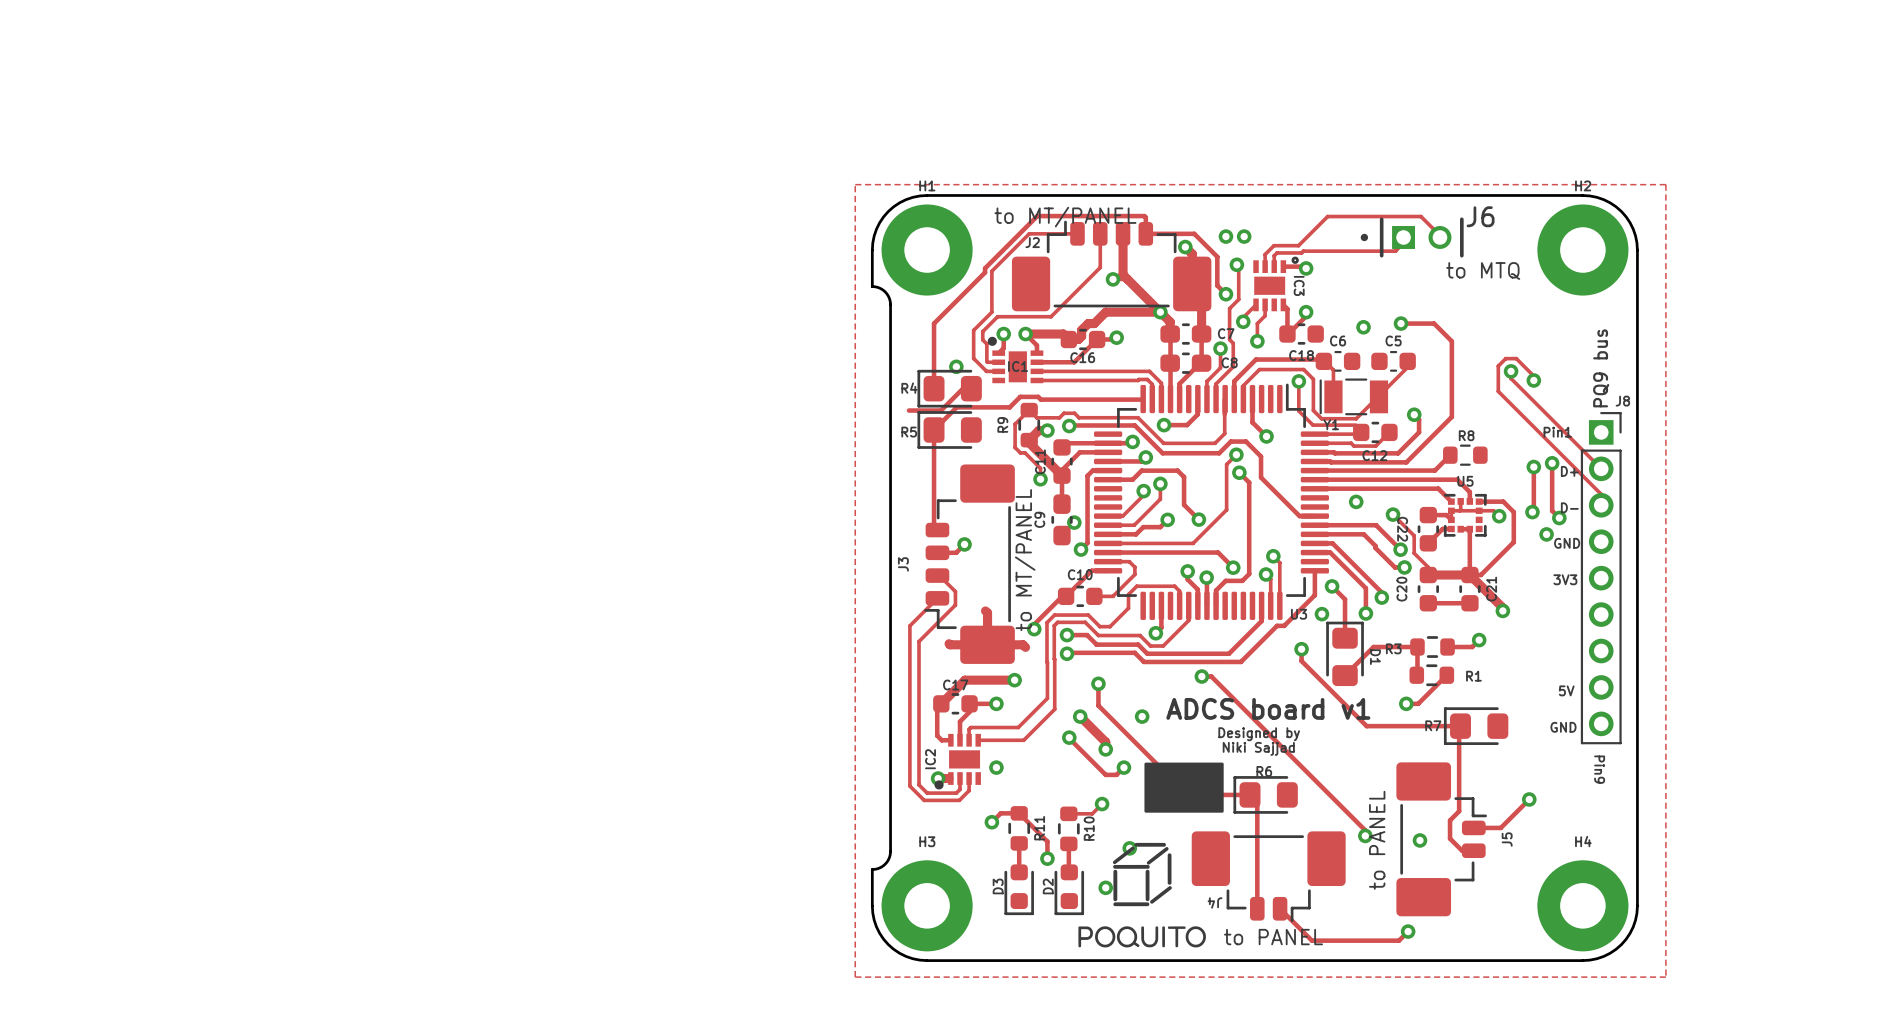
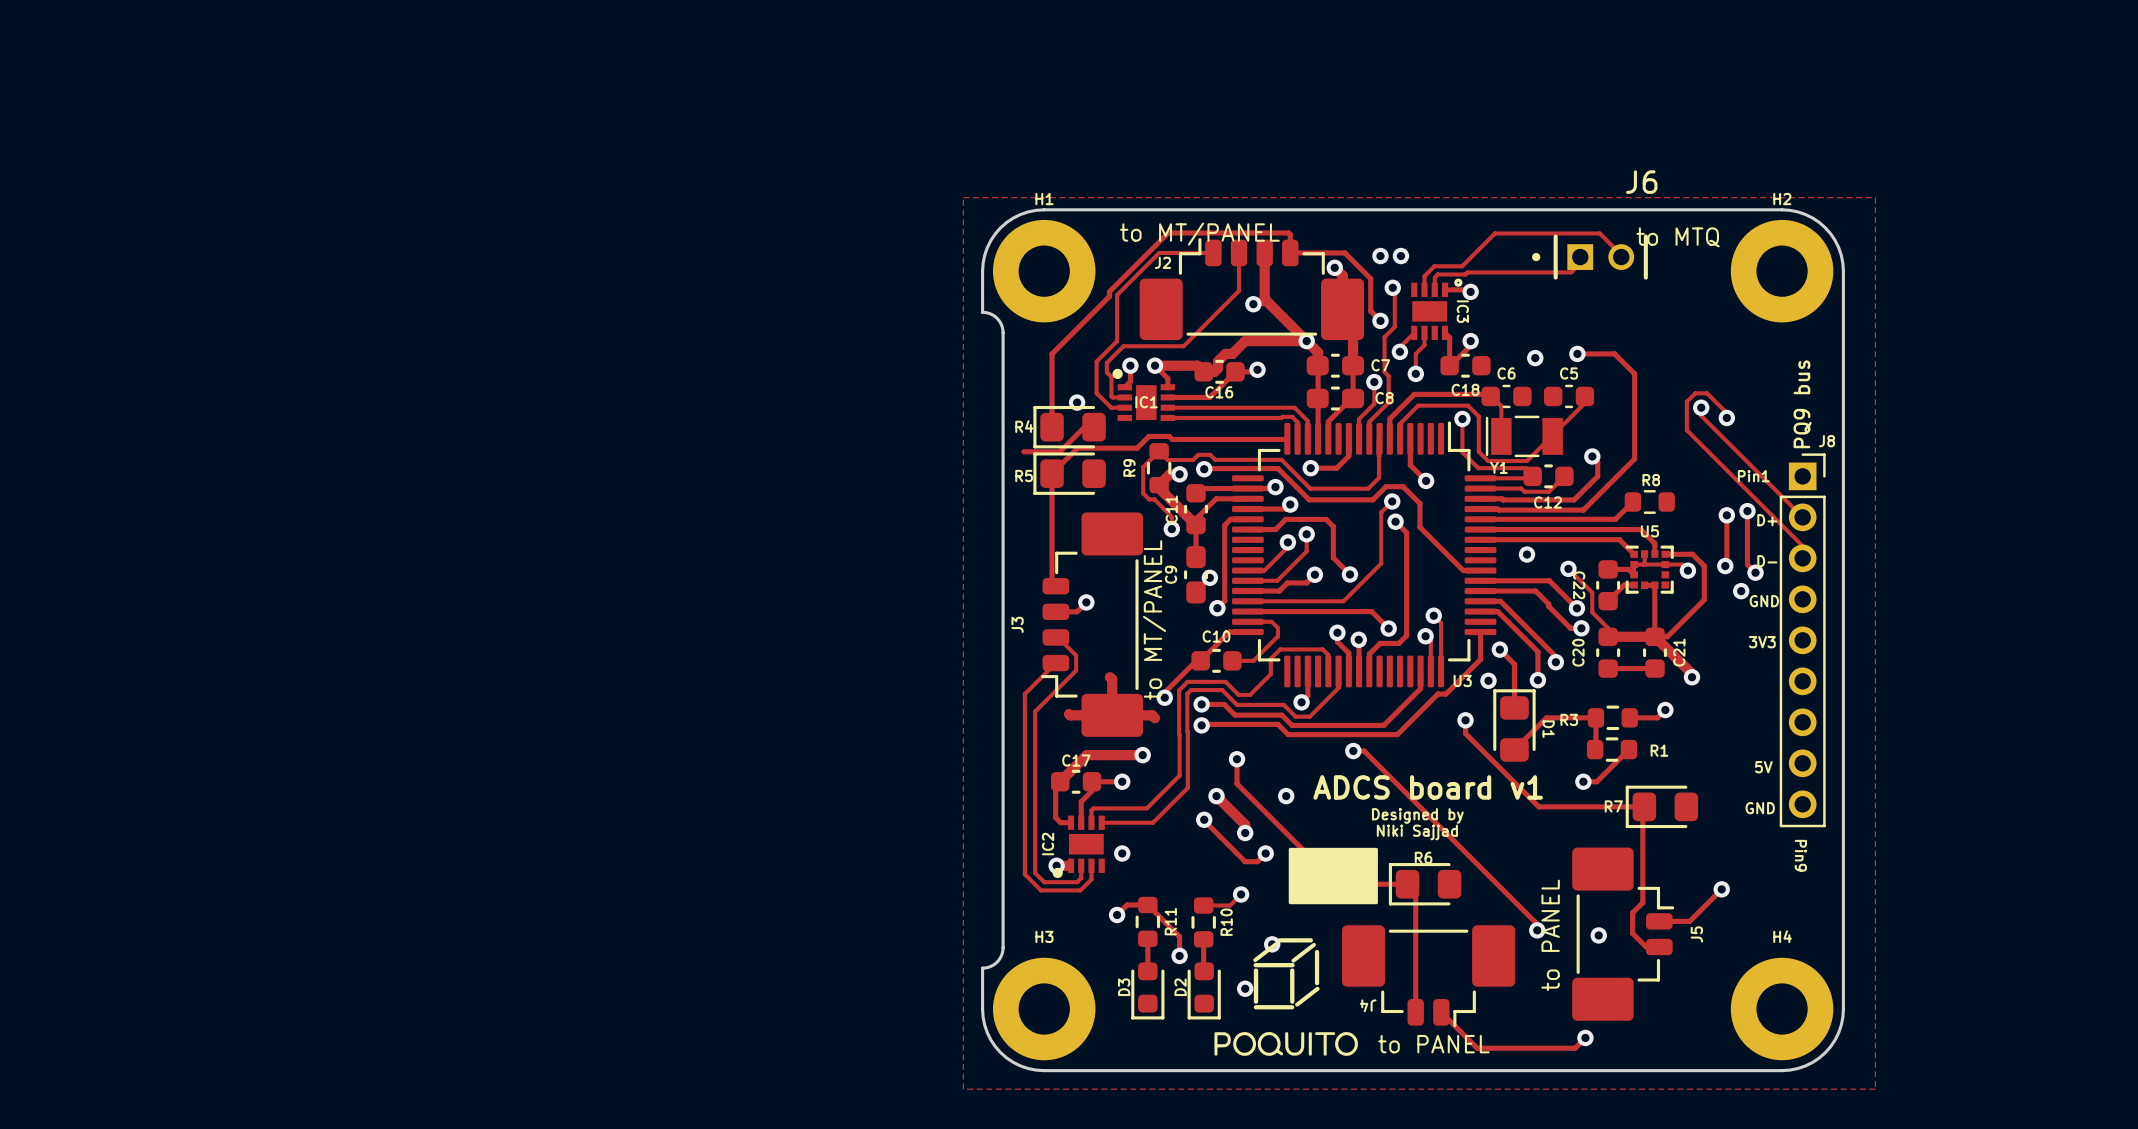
J6 name position: J6 (1480, 216) -> J6 (1641, 182)
text position: to MTQ (1483, 271) -> to MTQ (1678, 237)

